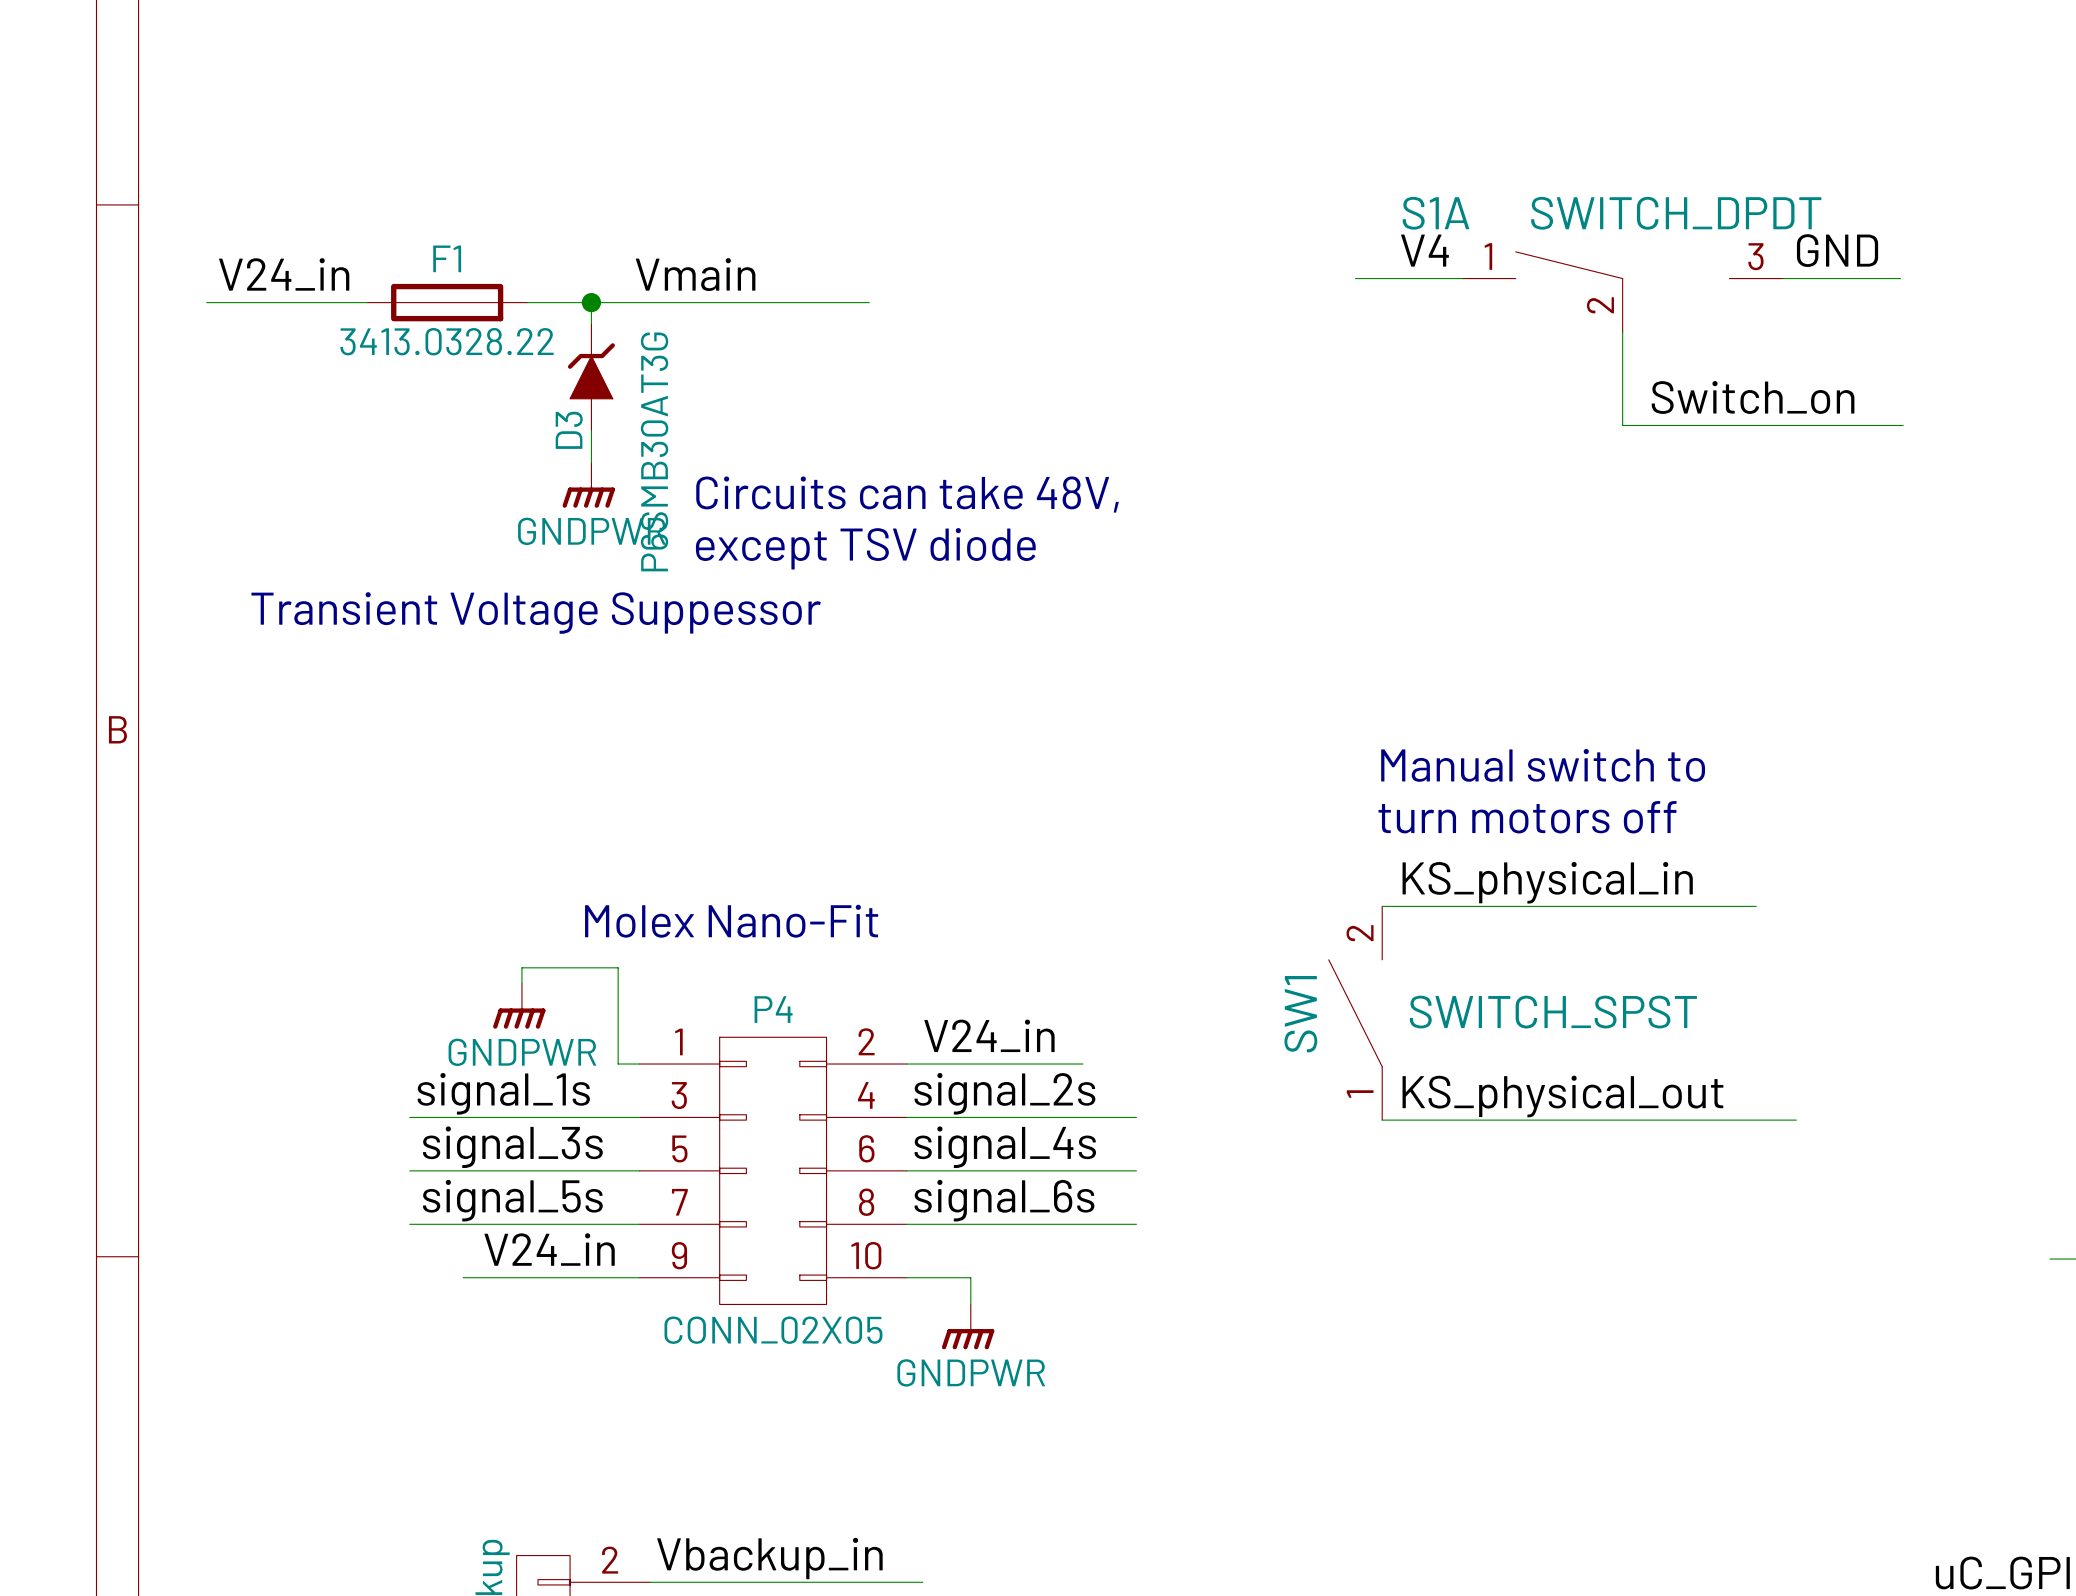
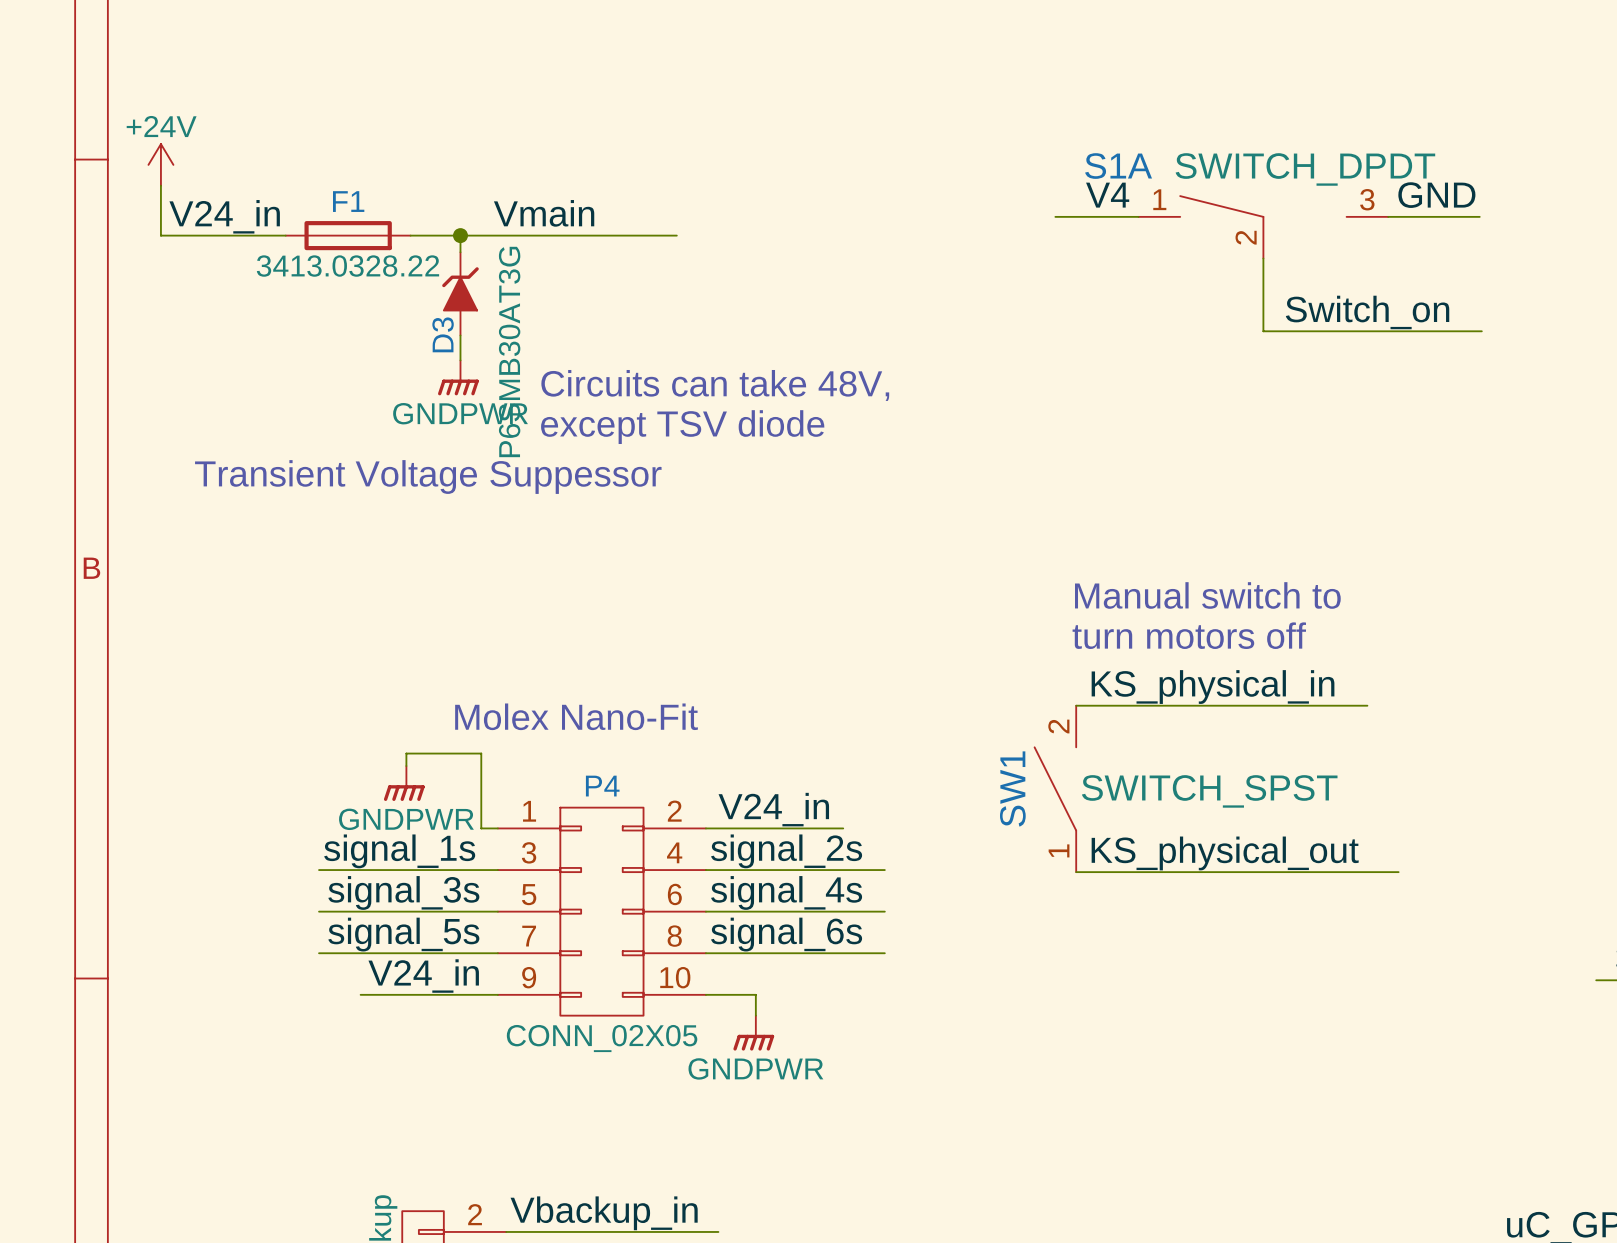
power symbol: none -> +24V (160, 164)
wire: none -> (160, 185) (160, 235)

